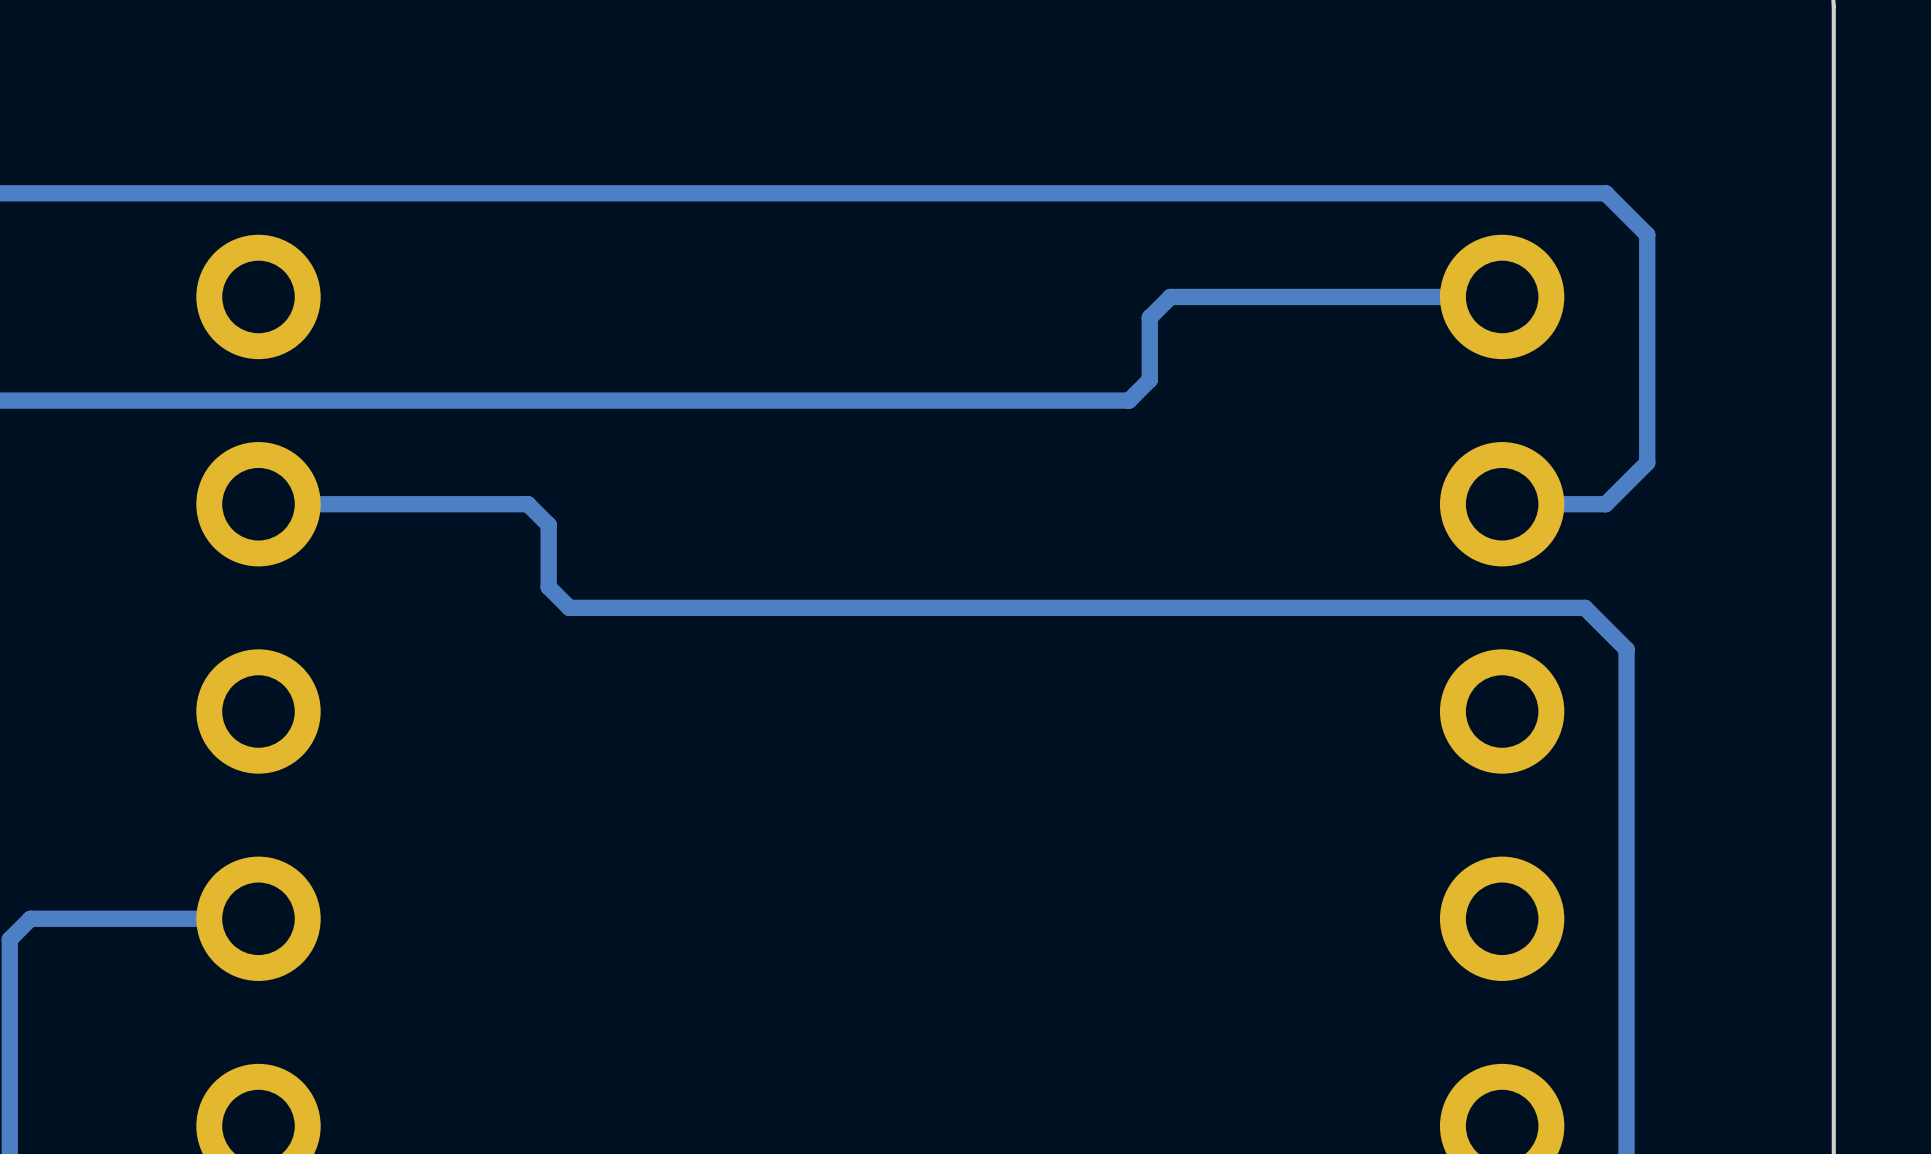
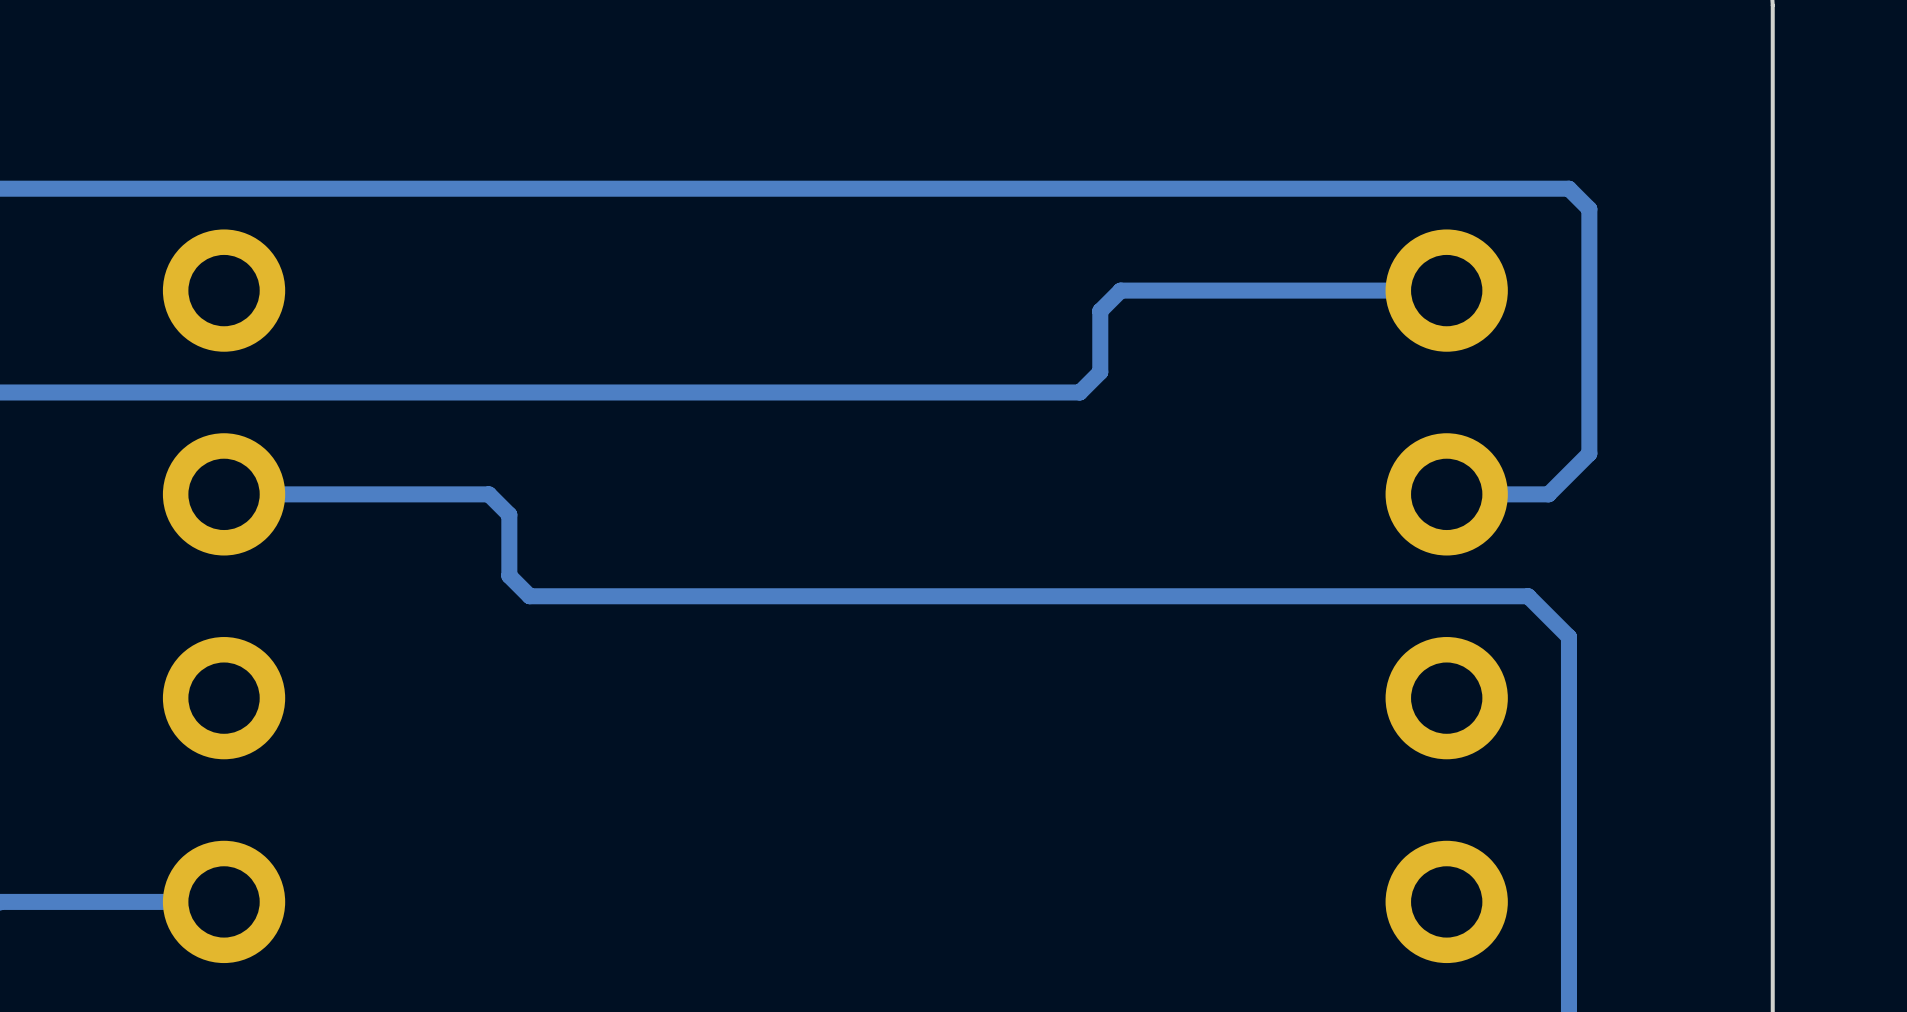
track: (1605, 193) (1647, 234) -> (1548, 188) (1568, 188) (1589, 209) (1589, 229)

